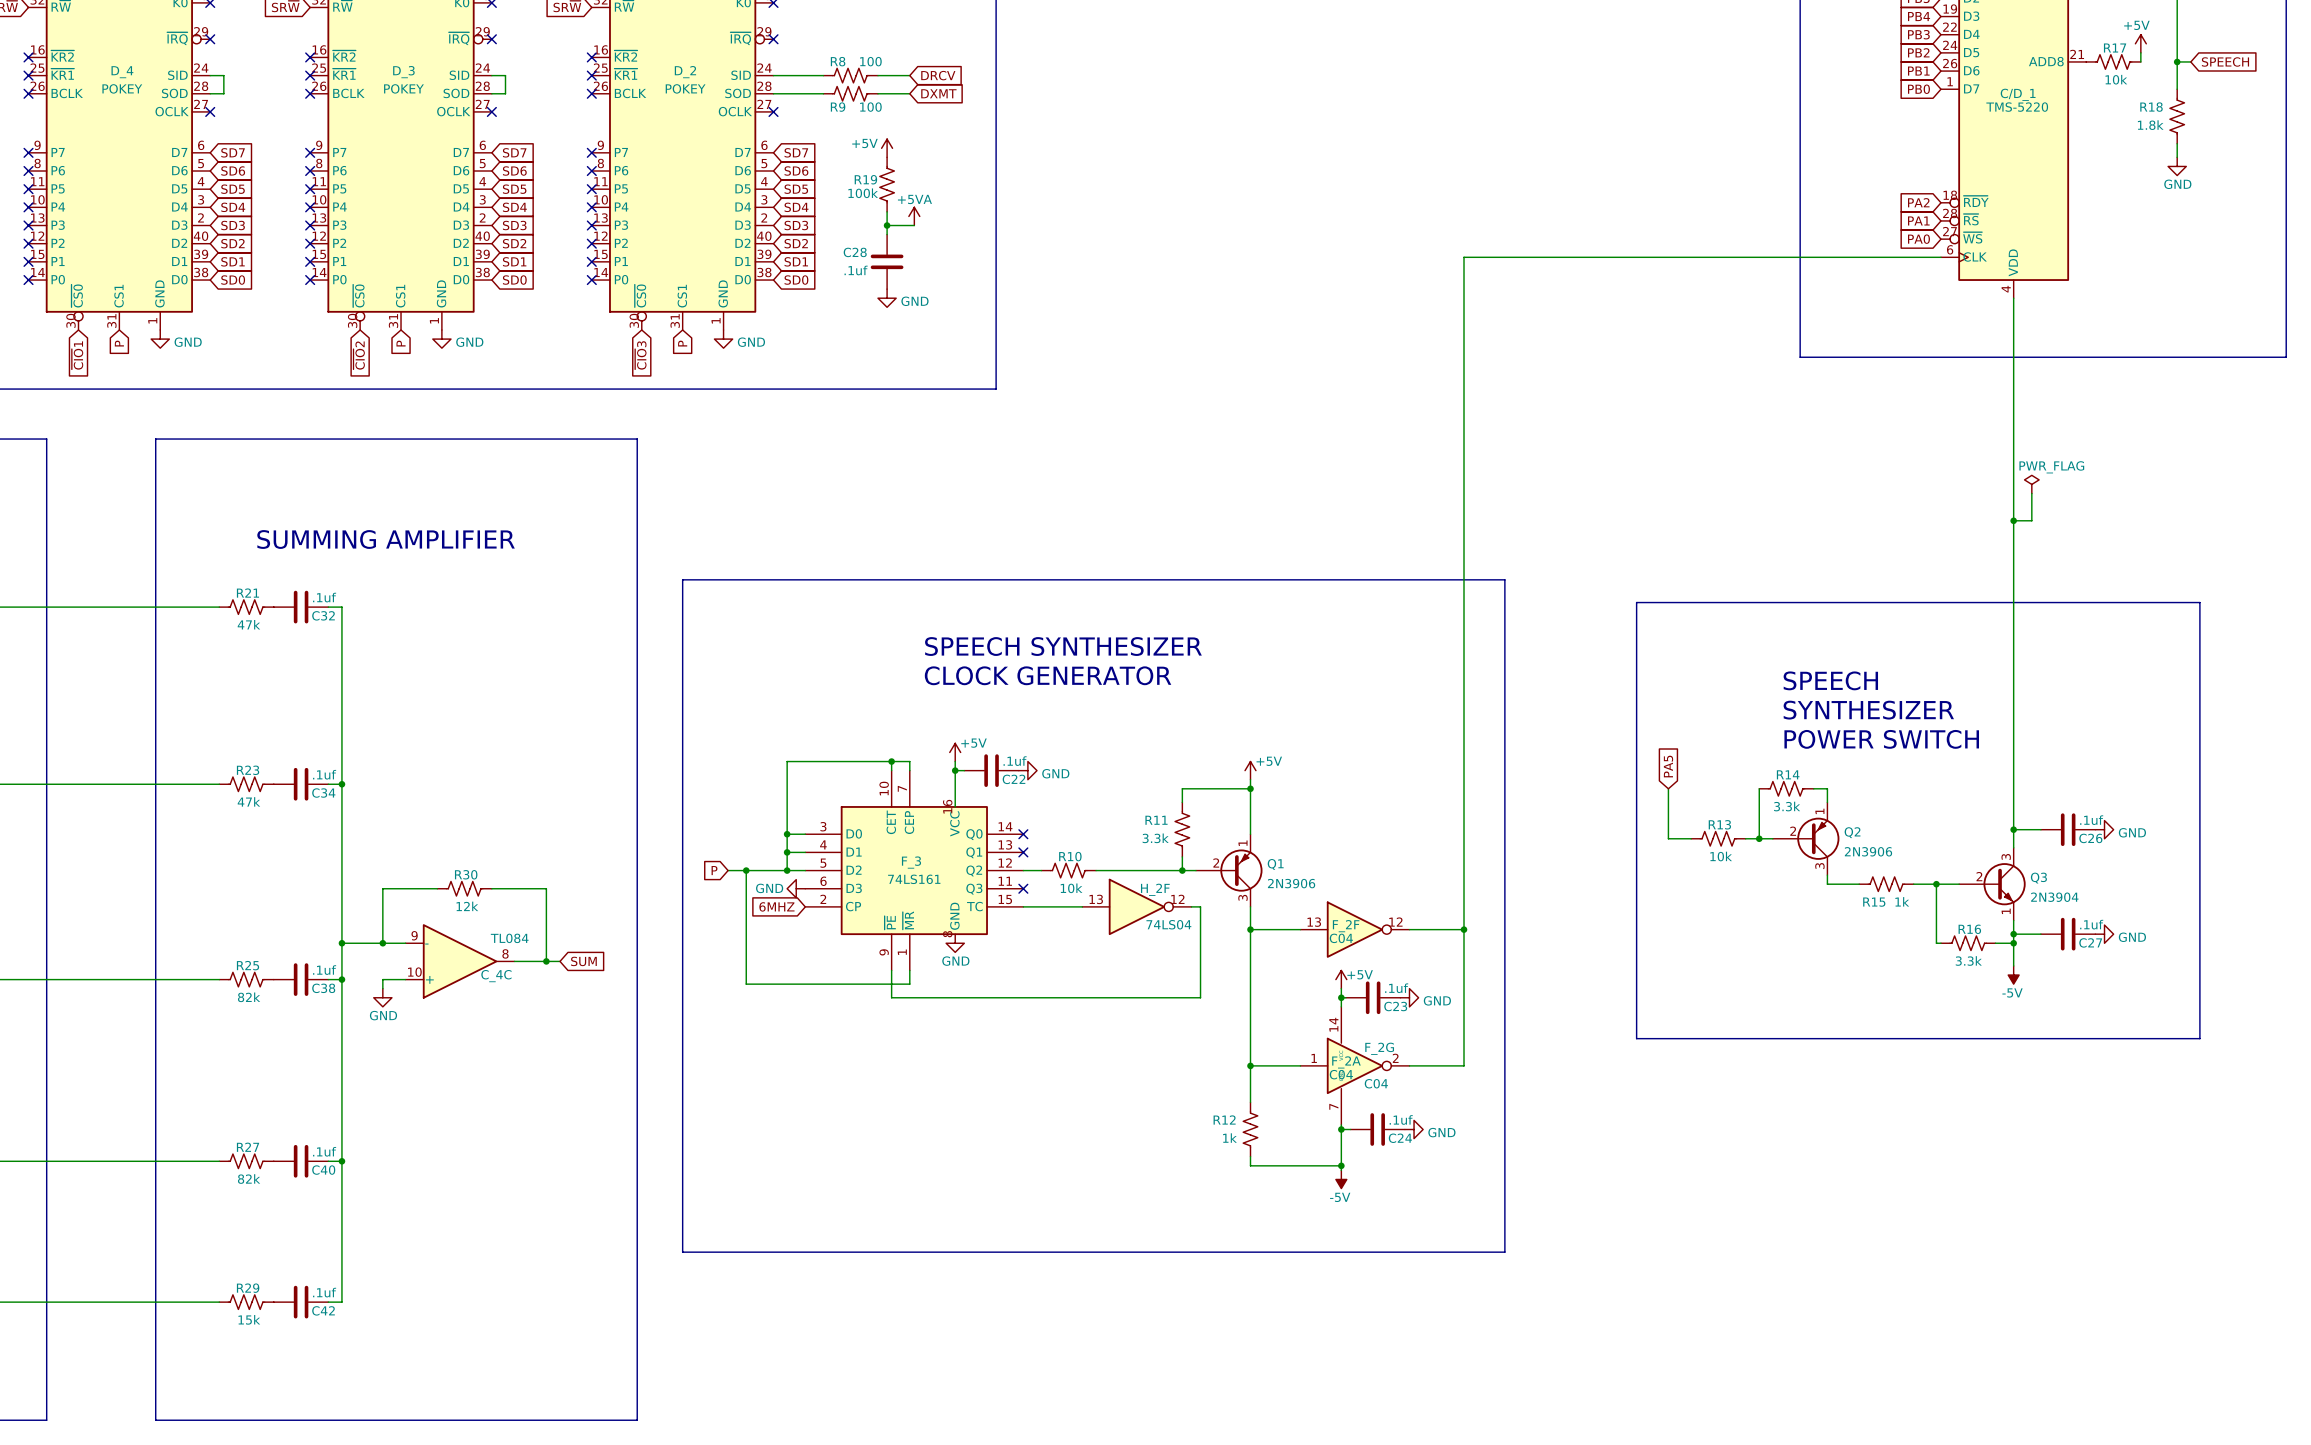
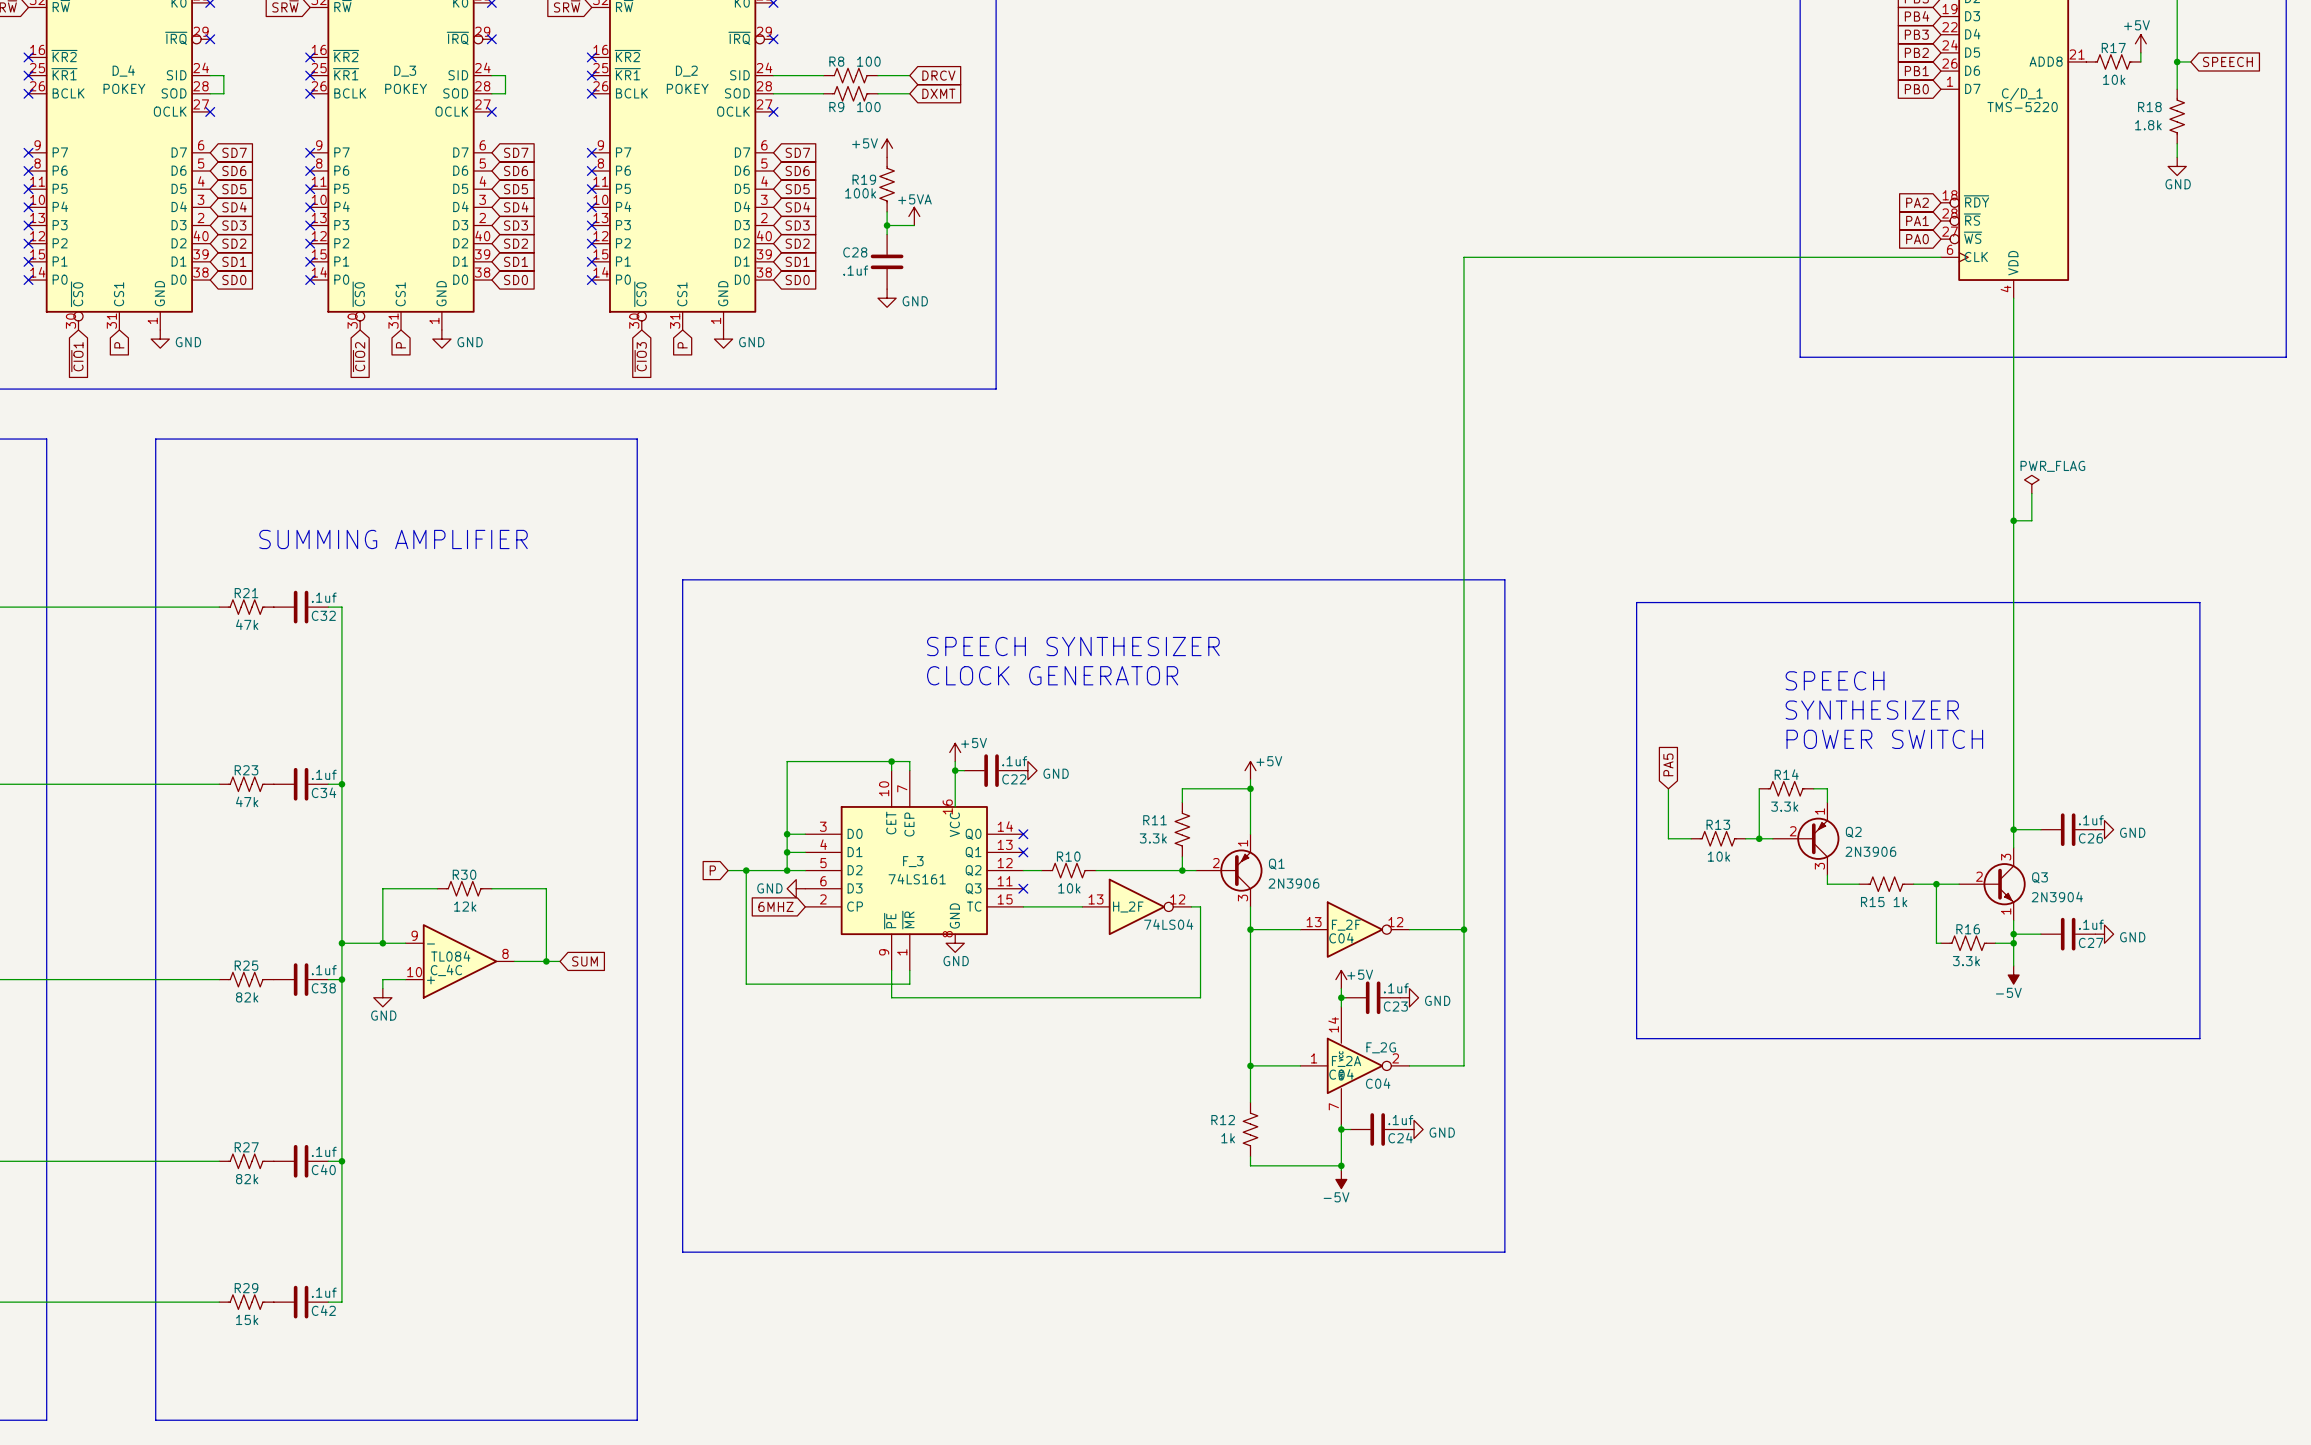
H_2F name position: H_2F (1155, 889) -> H_2F (1128, 907)
C_4C value position: TL084 (509, 938) -> TL084 (450, 956)
C_4C name position: C_4C (496, 976) -> C_4C (446, 970)

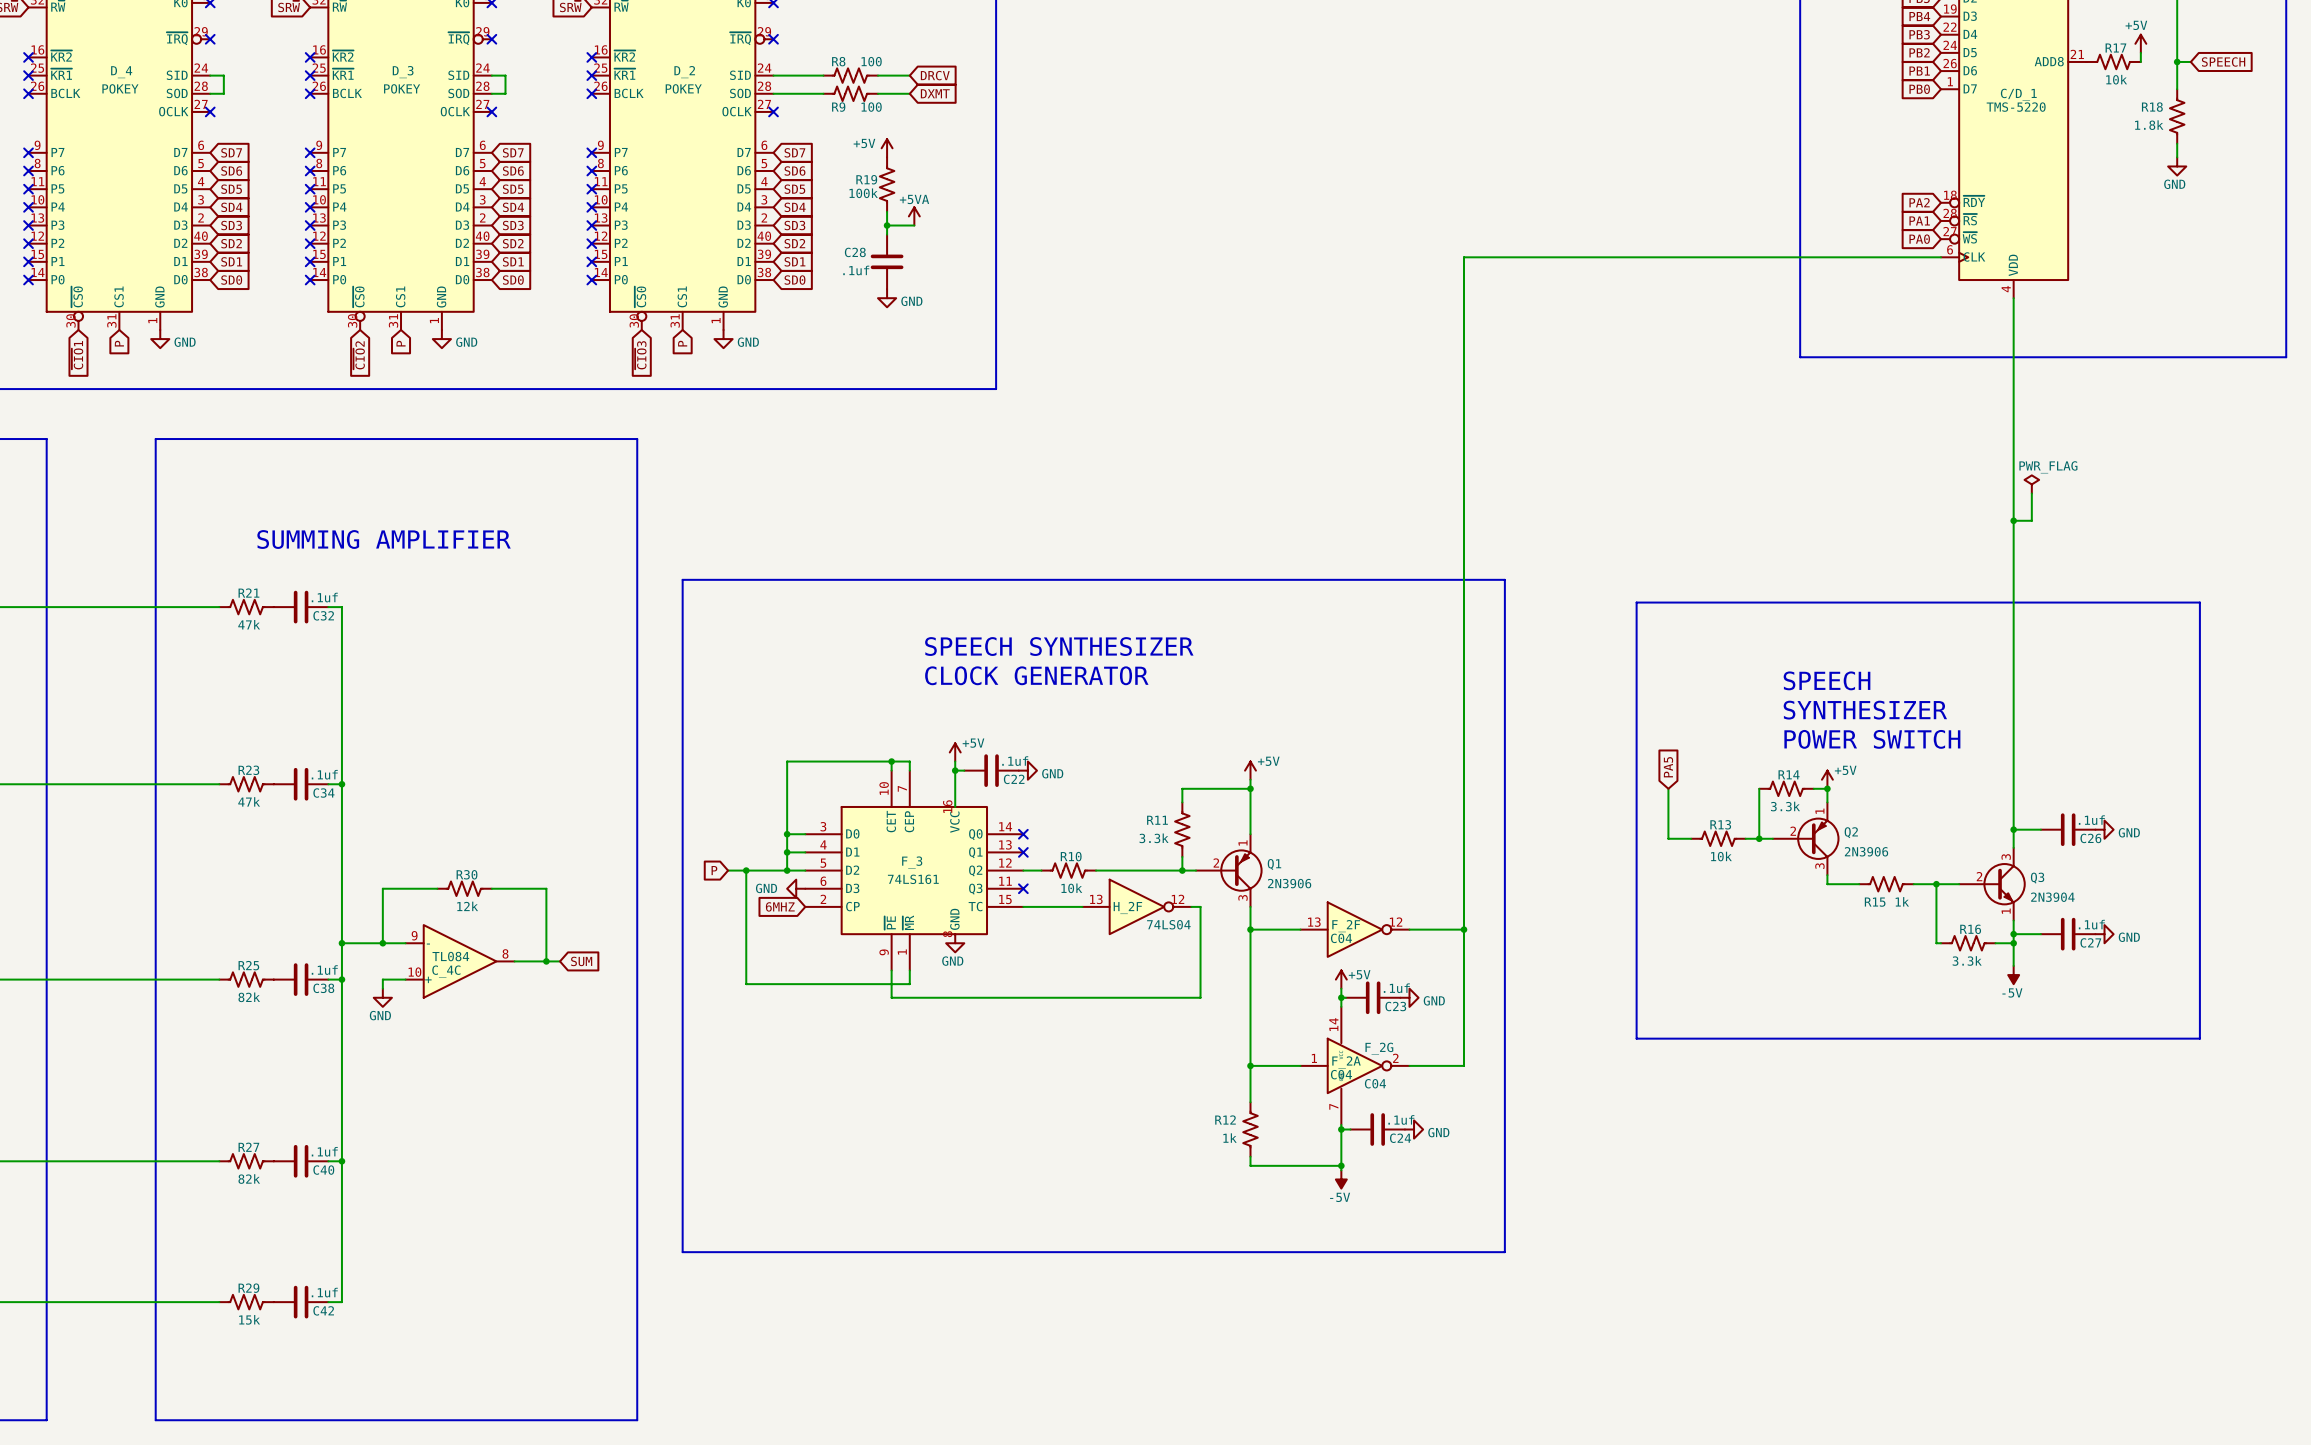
power symbol: none -> +5V (1827, 779)
junction: none -> (1827, 788)

